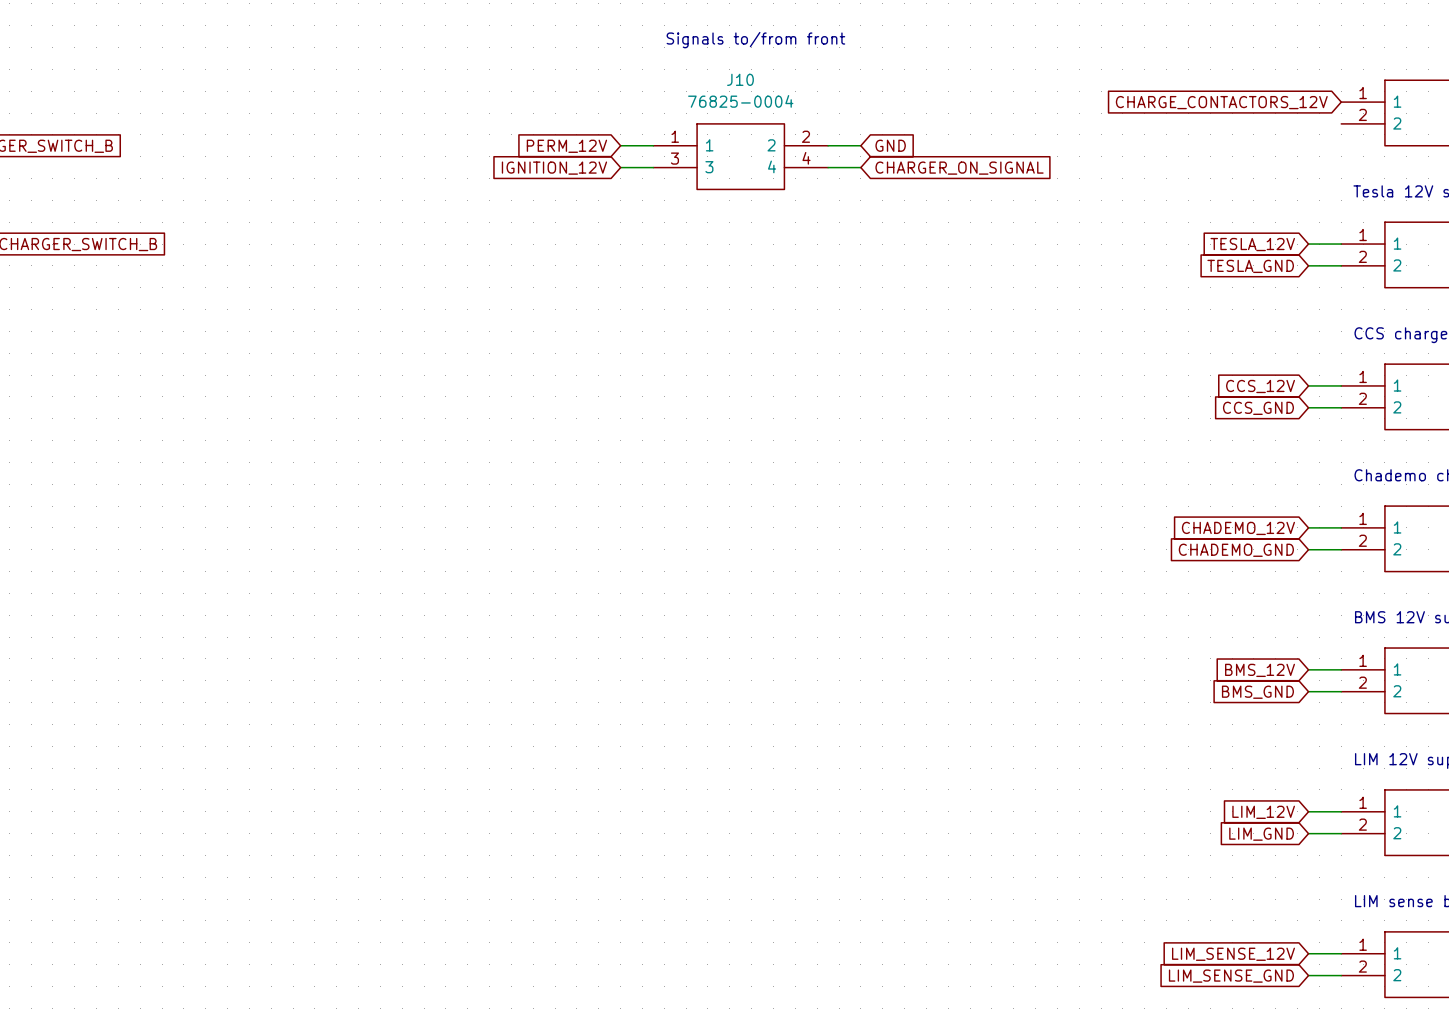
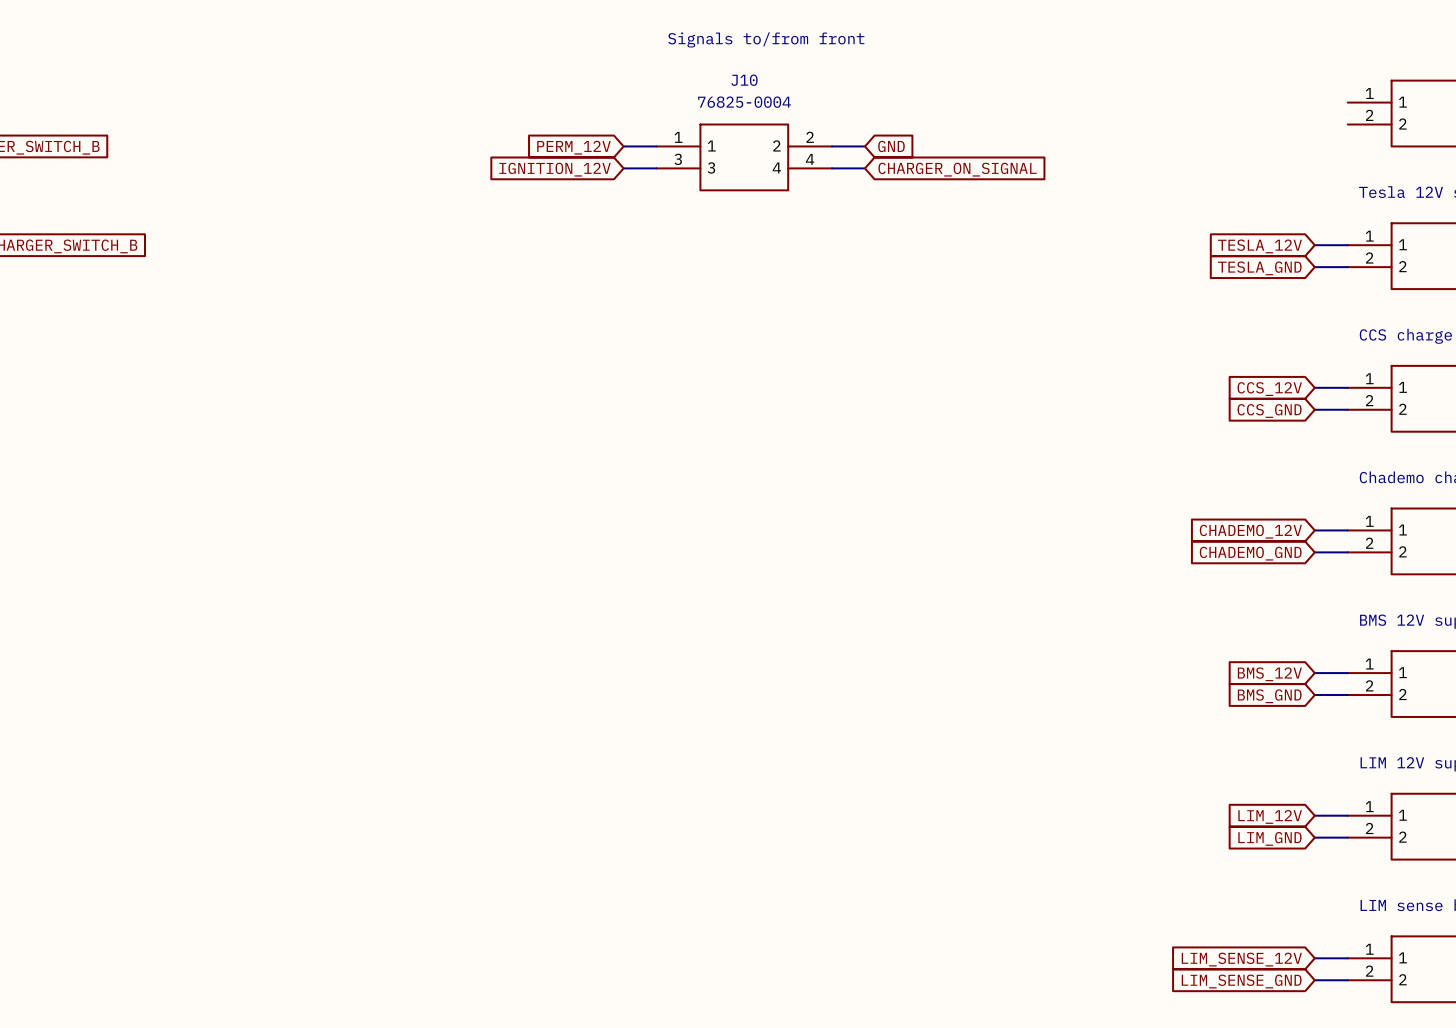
global label: CHARGE_CONTACTORS_12V (1221, 102) -> none

